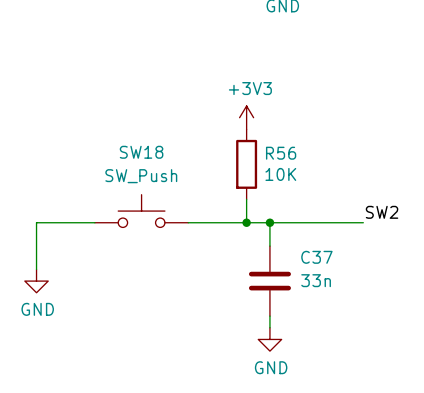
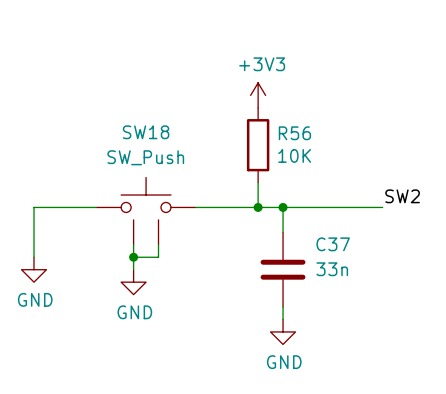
SW18 symbol: [94, 194, 189, 228] -> [96, 177, 196, 245]
wire: none -> (133, 244) (133, 269)
wire: none -> (158, 244) (158, 257) (133, 257)
junction: none -> (133, 257)
power symbol: none -> GND (133, 282)

